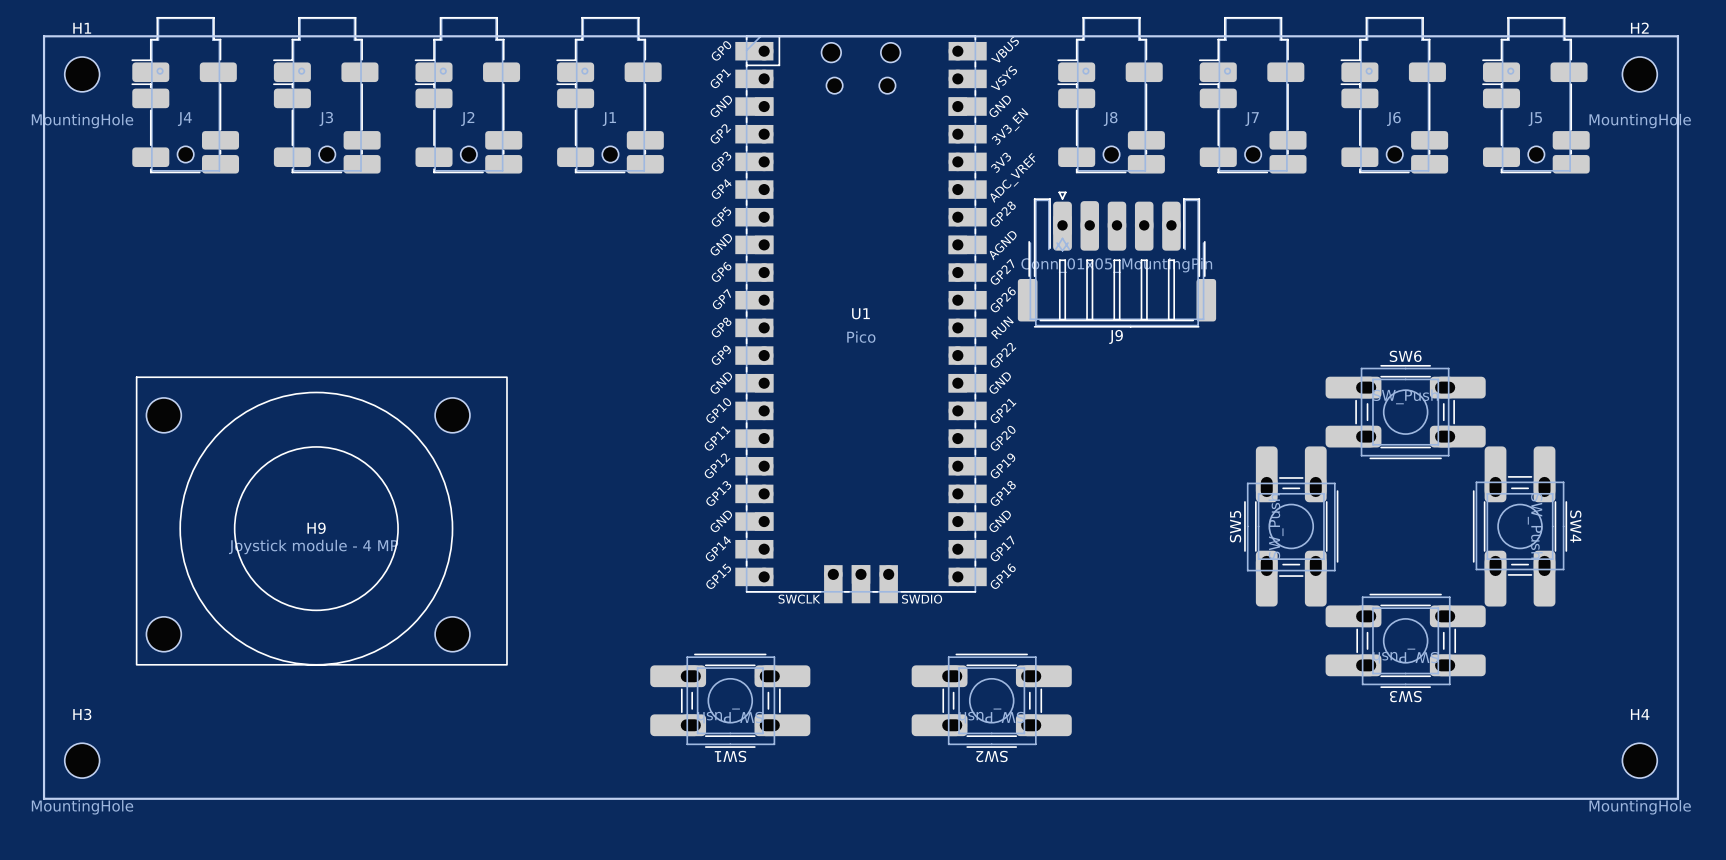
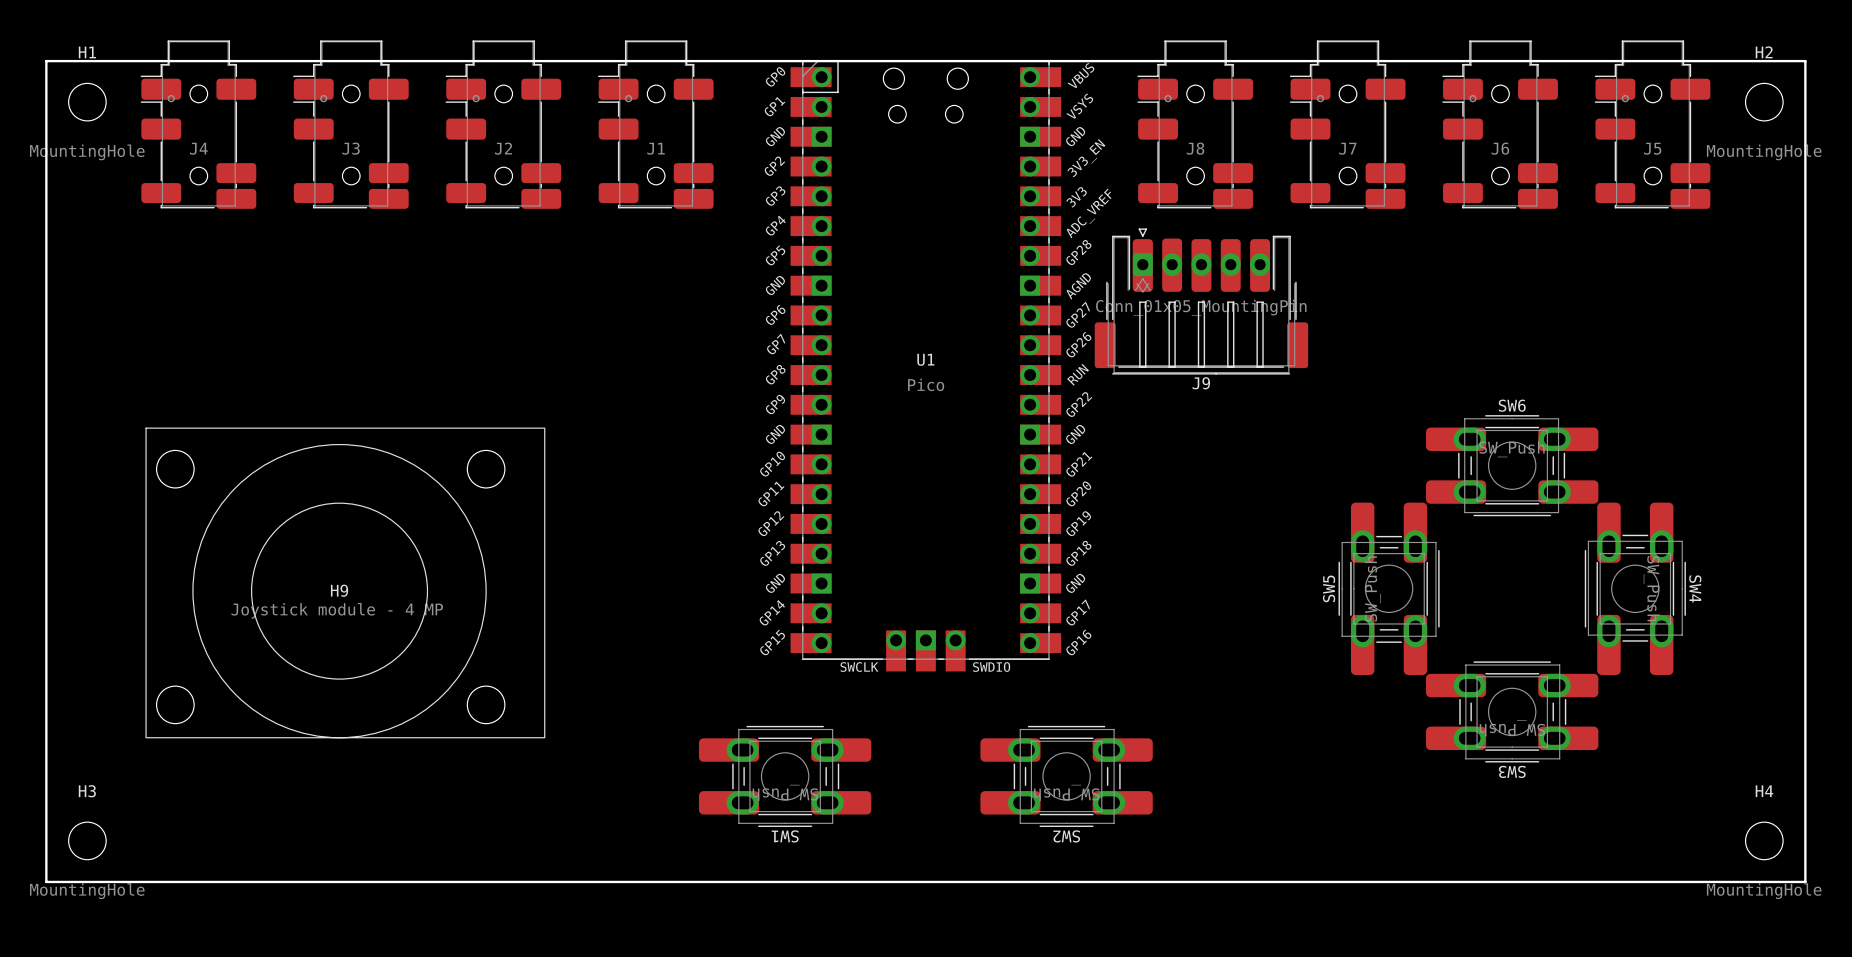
J4 footprint: [131, 17, 240, 174] -> [140, 40, 257, 209]
J3 footprint: [273, 17, 381, 174] -> [293, 40, 409, 209]
J2 footprint: [414, 17, 523, 174] -> [445, 40, 562, 209]
J1 footprint: [556, 17, 664, 174] -> [597, 40, 714, 209]
J8 footprint: [1057, 17, 1165, 174] -> [1137, 40, 1254, 209]
J7 footprint: [1199, 17, 1307, 174] -> [1289, 40, 1406, 209]
J6 footprint: [1340, 17, 1449, 174] -> [1442, 40, 1558, 209]
J5 footprint: [1482, 17, 1590, 174] -> [1594, 40, 1711, 209]

